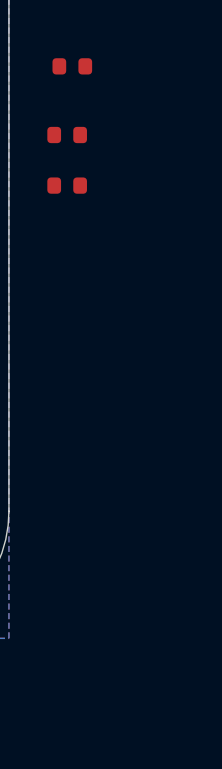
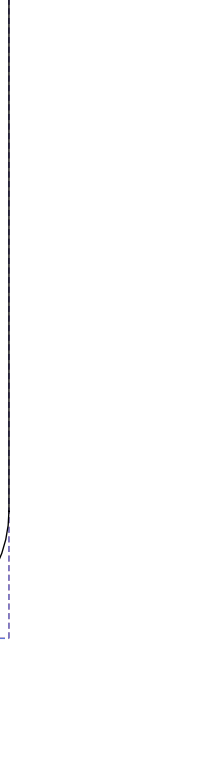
part: (72, 66) -> none
part: (67, 135) -> none
part: (67, 185) -> none

